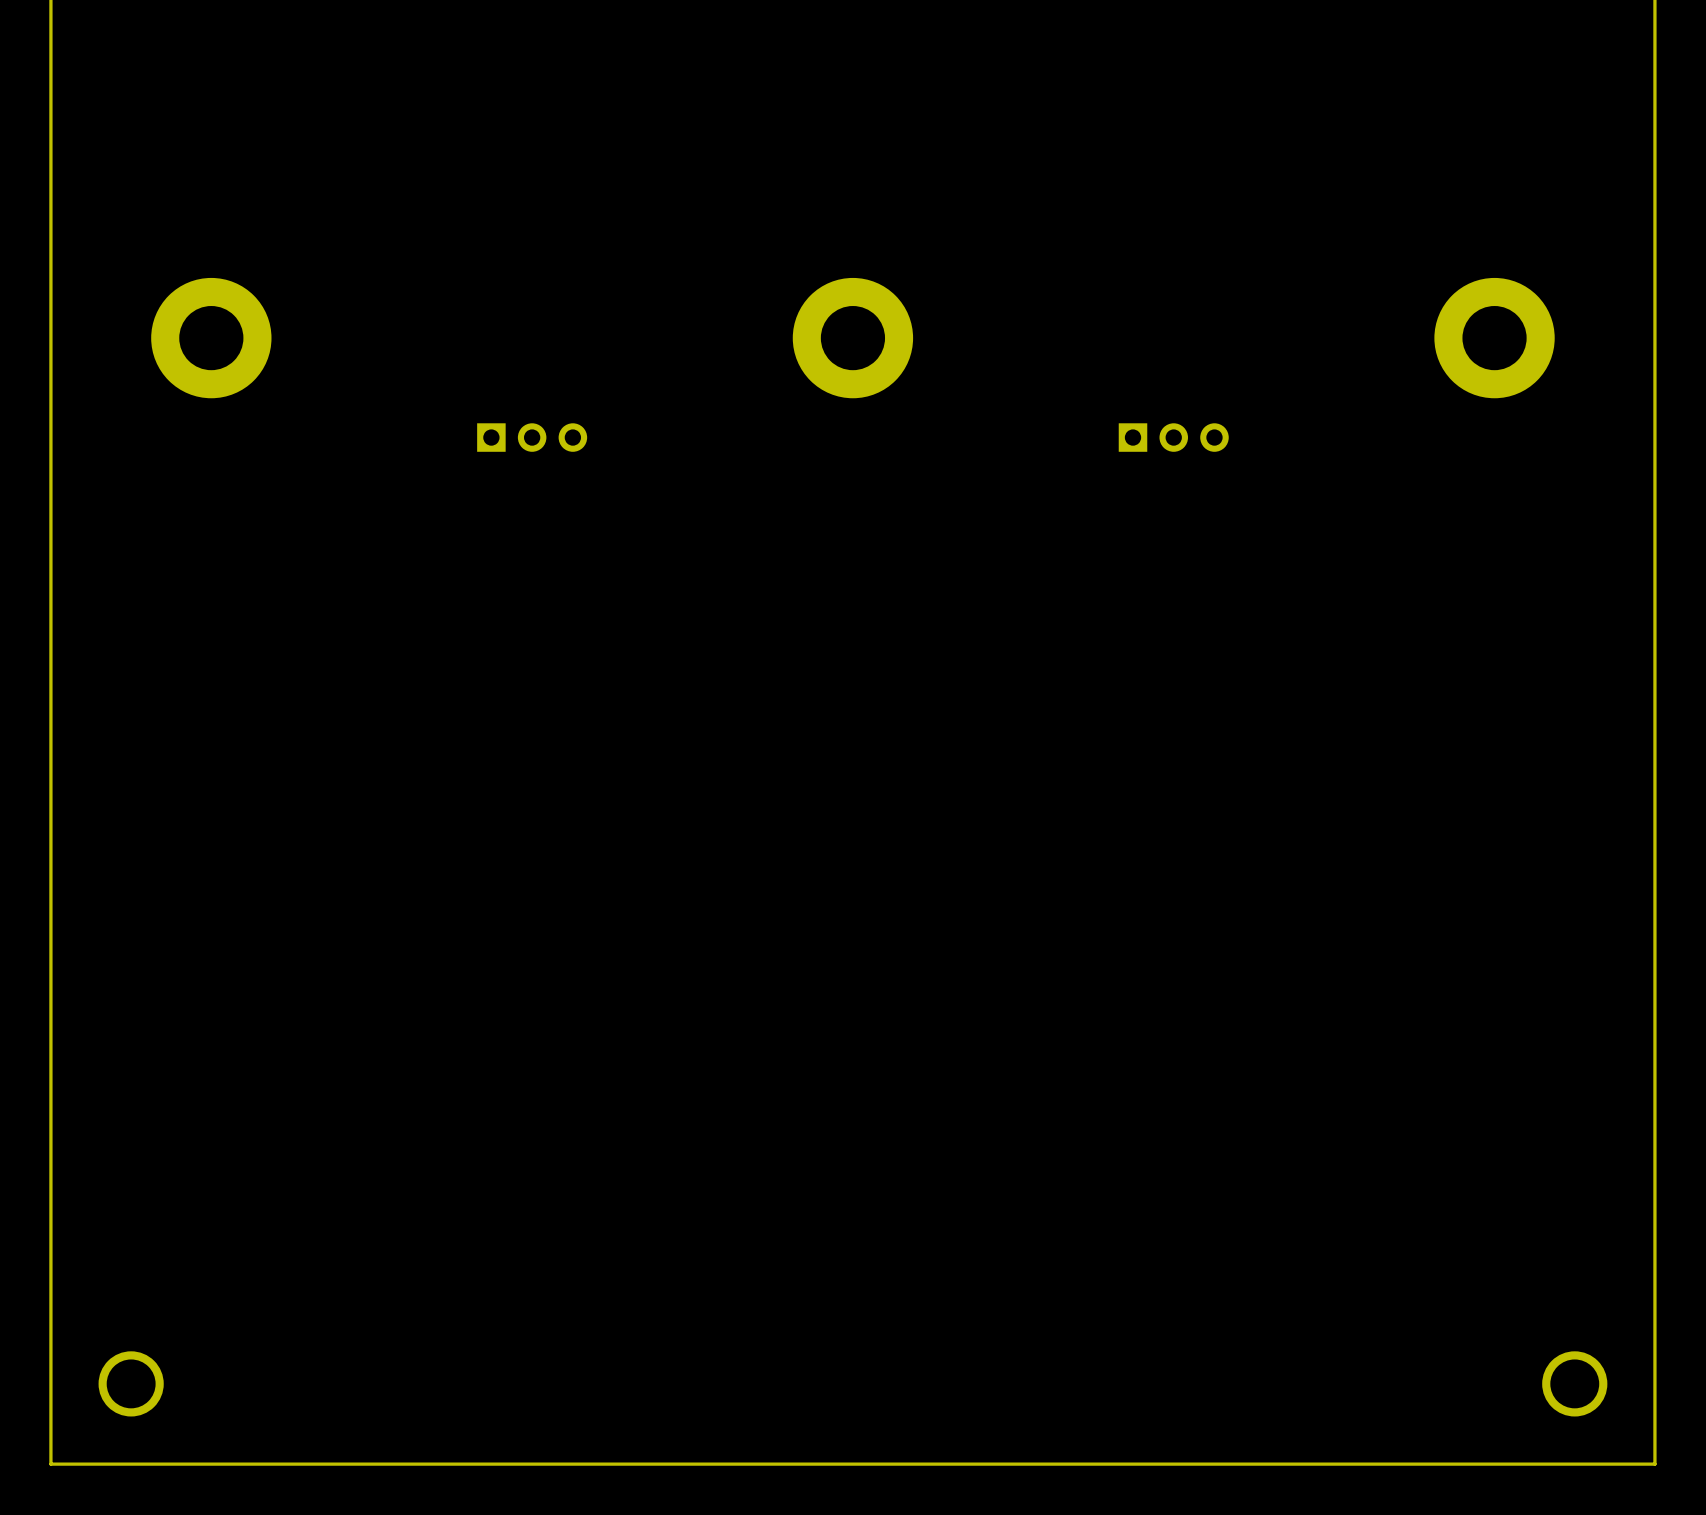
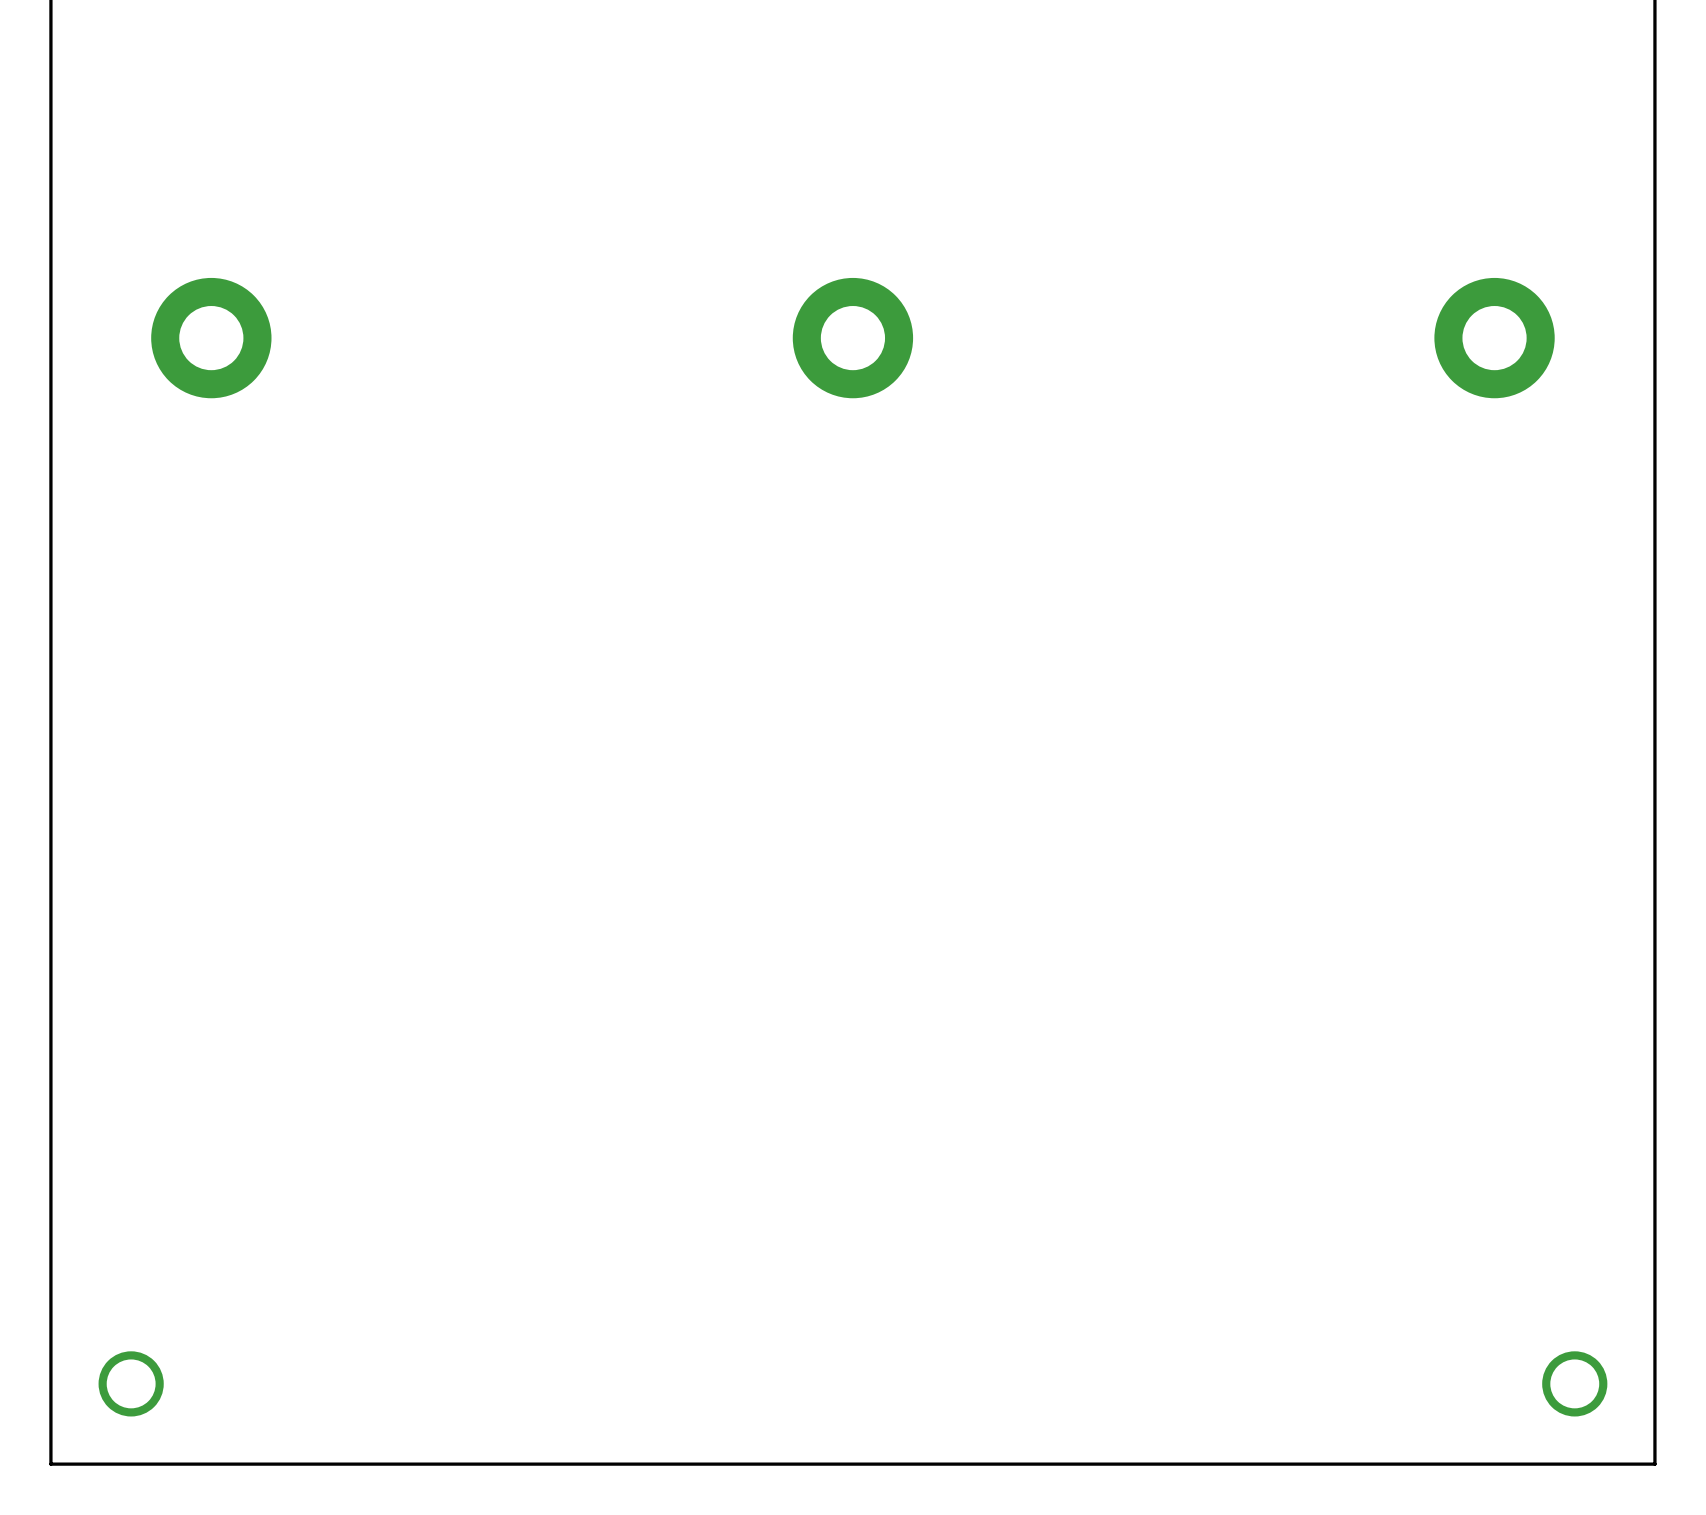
part: (532, 437) -> none
part: (1173, 437) -> none

